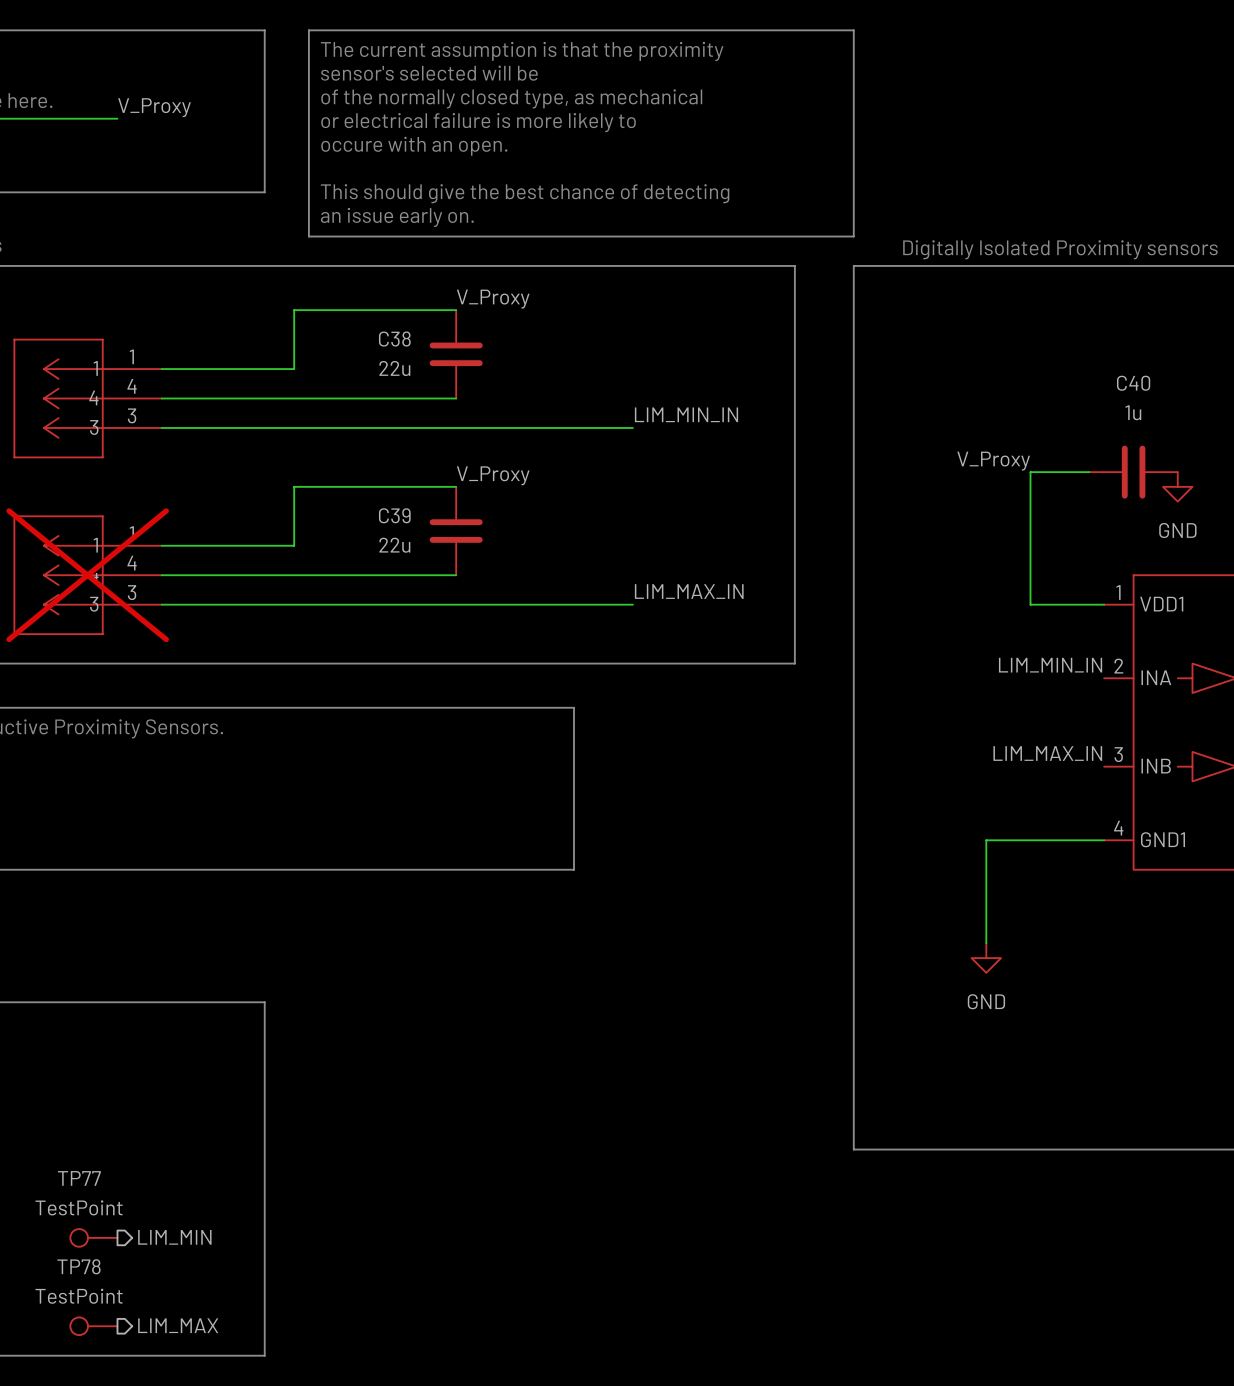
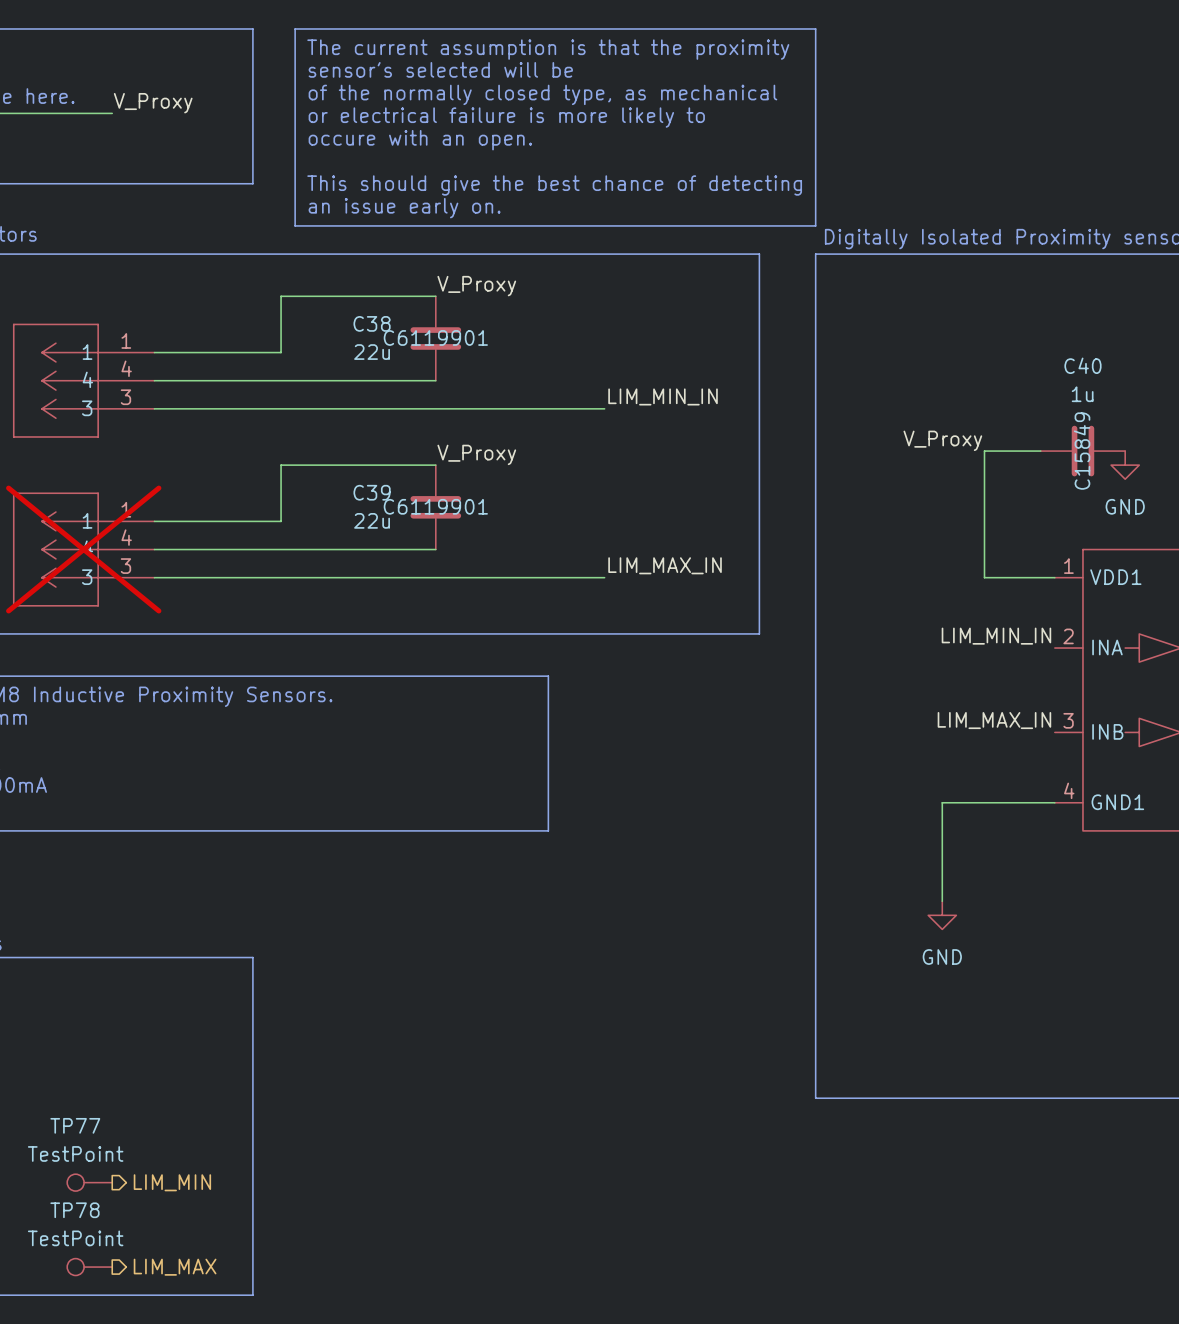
C38 text: none -> C6119901 (435, 337)
C40 text: none -> C15849 (1082, 451)
C39 text: none -> C6119901 (435, 506)

